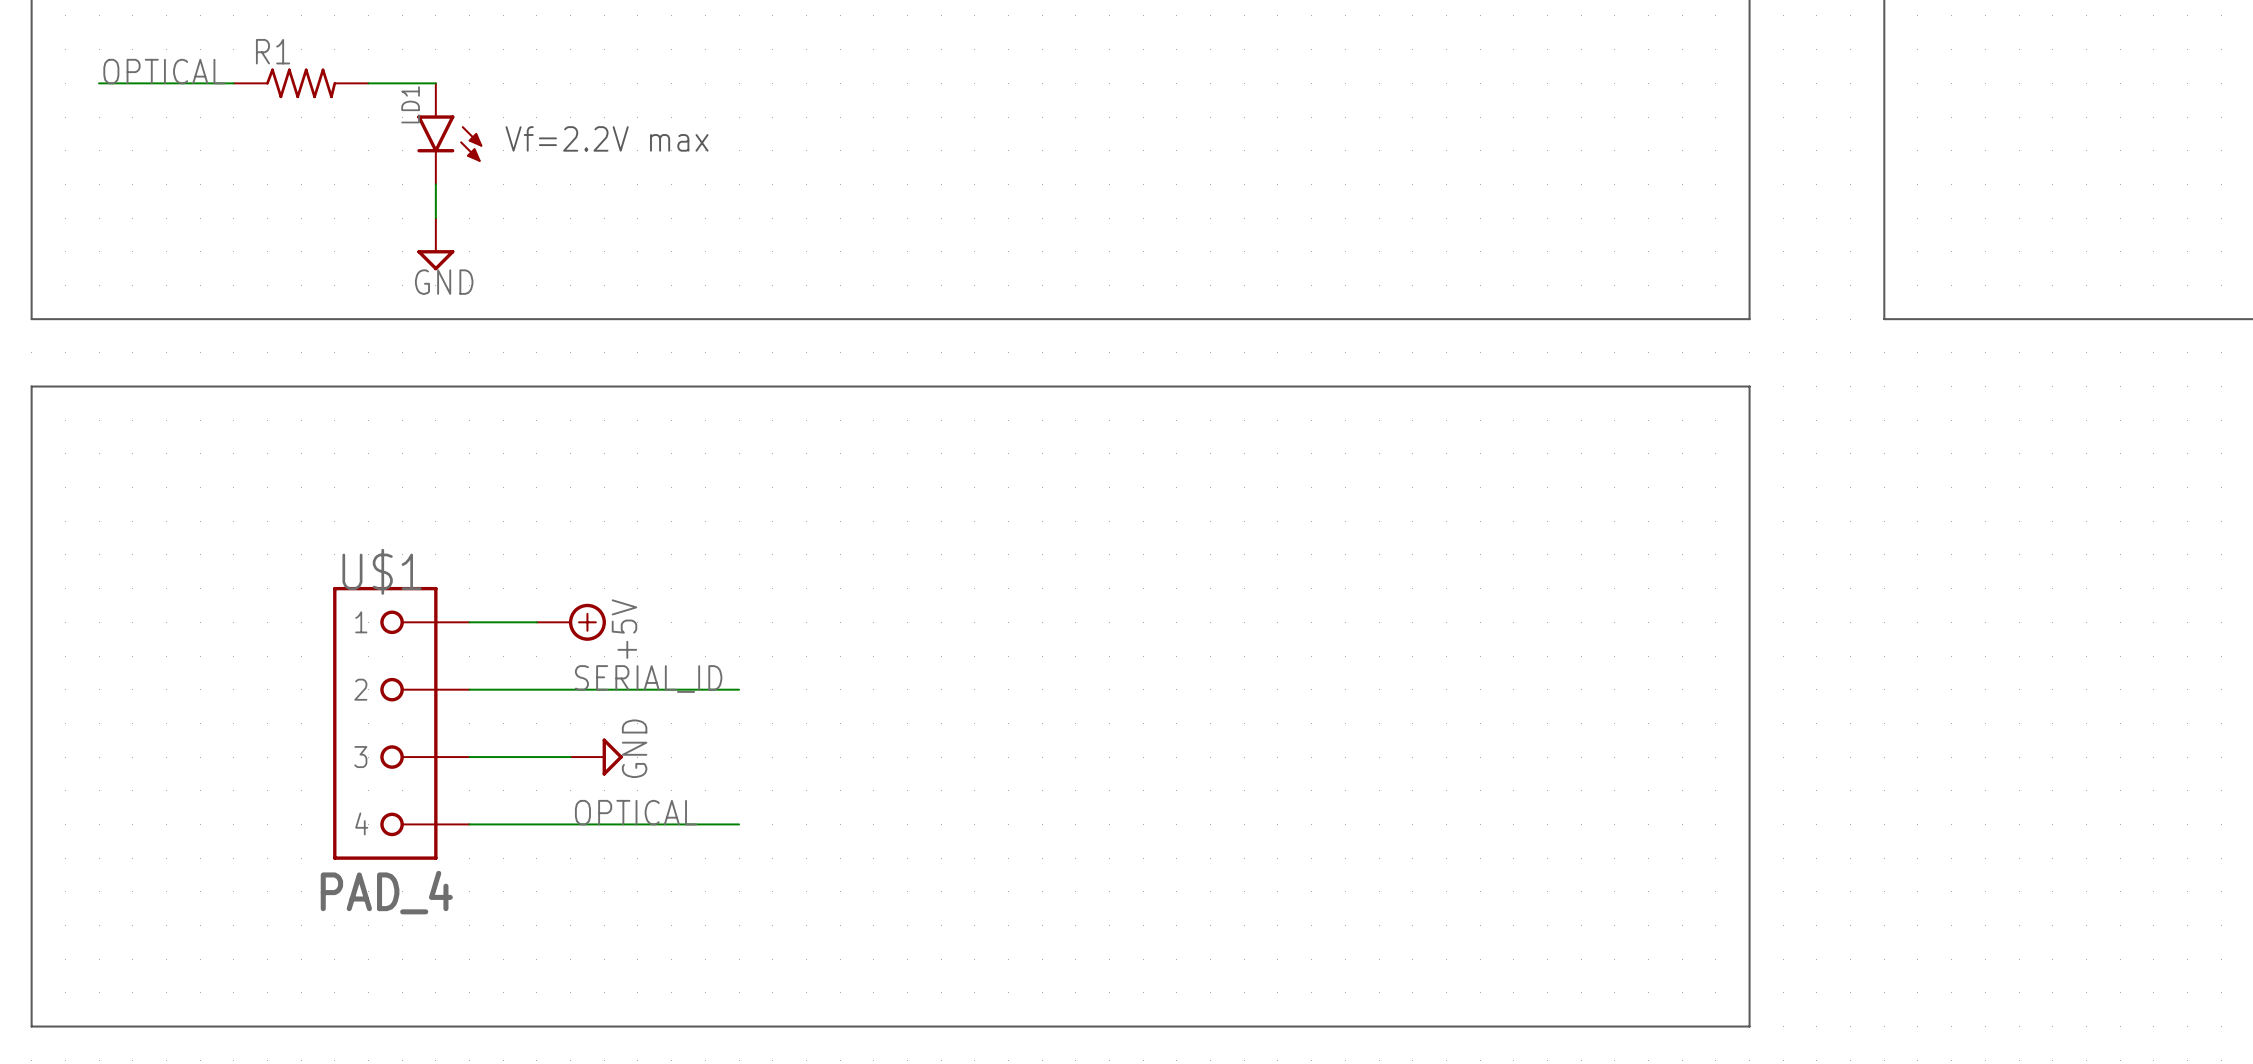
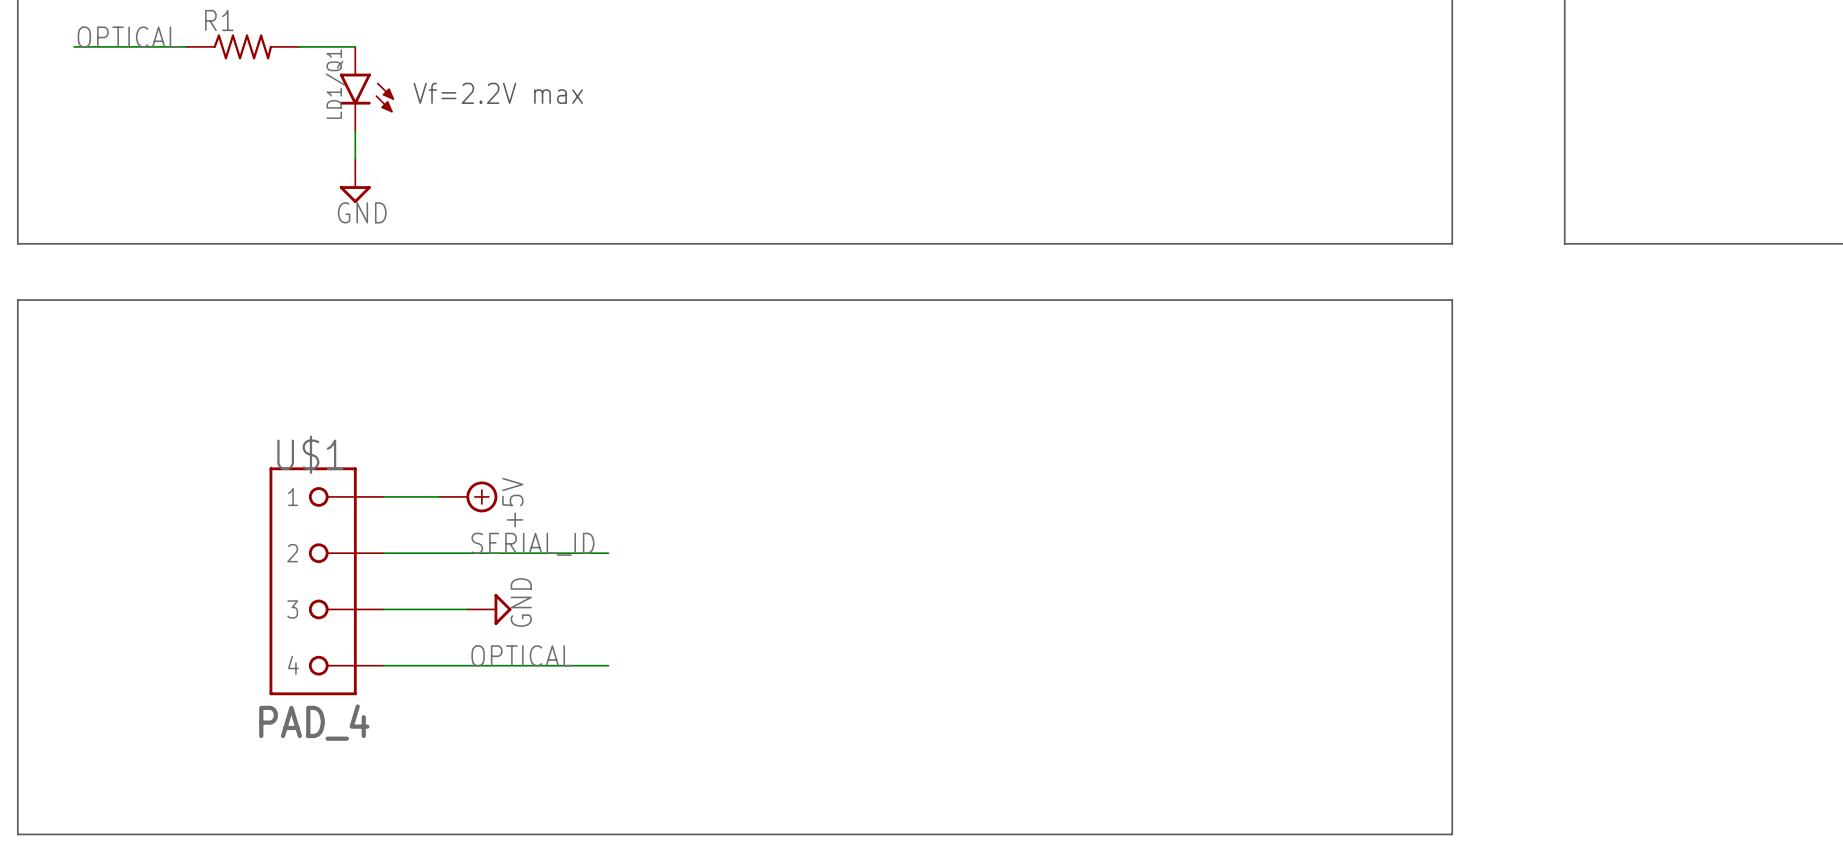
LD1 name: LD1 (410, 104) -> LD1/Q1 (335, 84)

